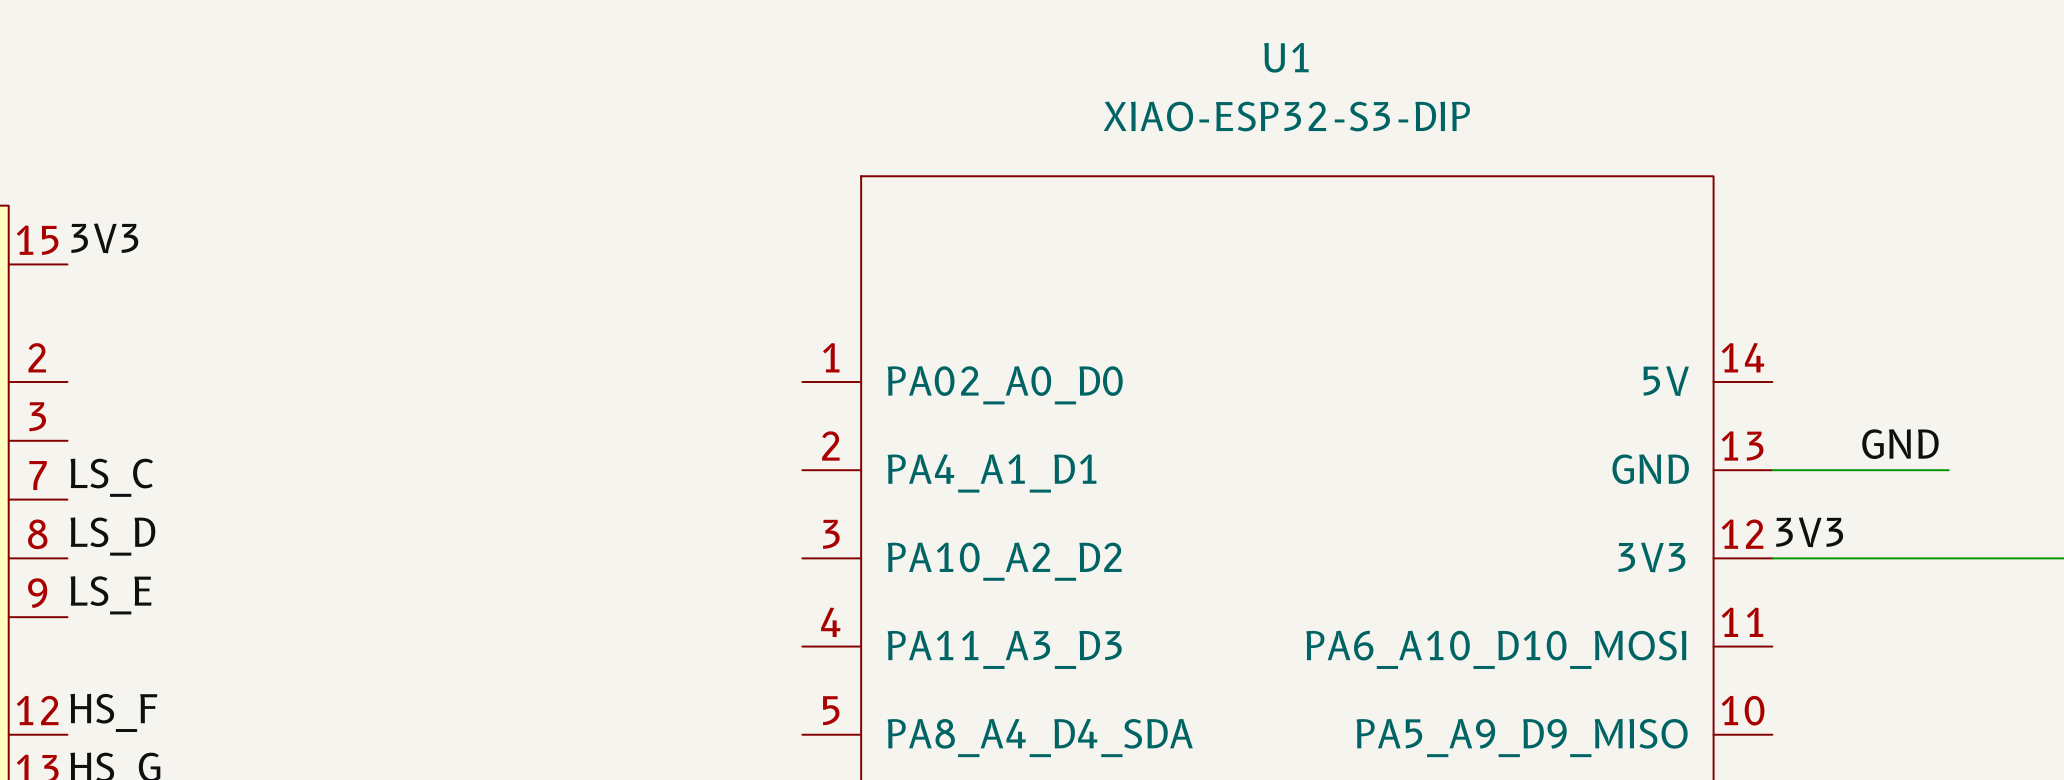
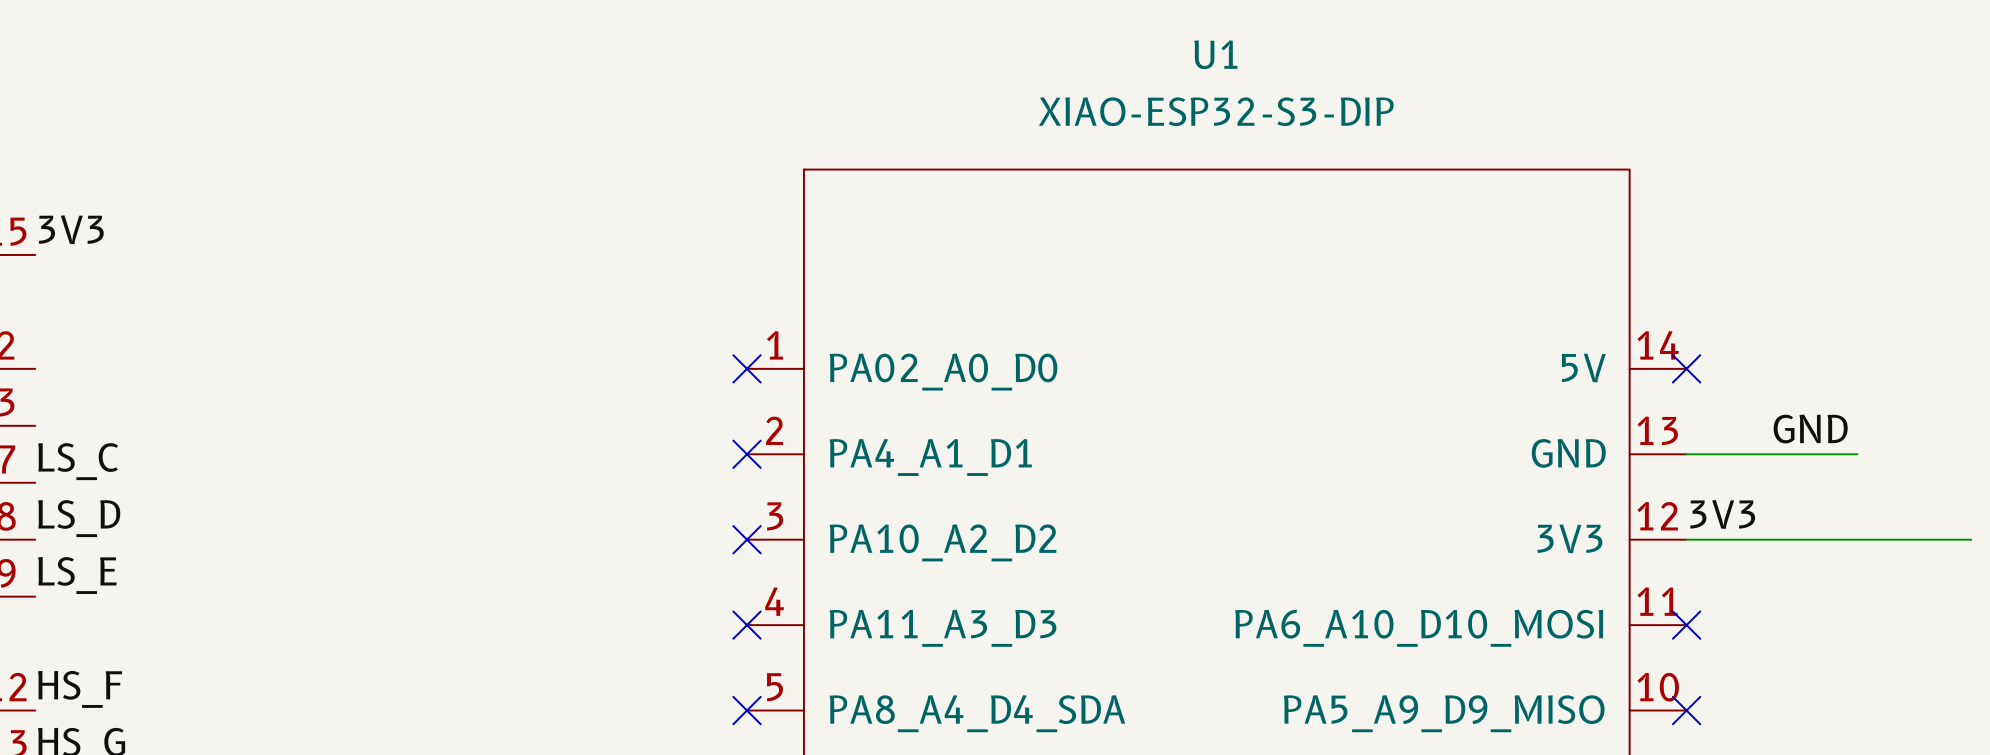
no-connect mark: none -> (747, 368)
no-connect mark: none -> (1686, 368)
no-connect mark: none -> (747, 454)
no-connect mark: none -> (747, 539)
no-connect mark: none -> (747, 625)
no-connect mark: none -> (1686, 625)
no-connect mark: none -> (747, 710)
no-connect mark: none -> (1686, 710)

